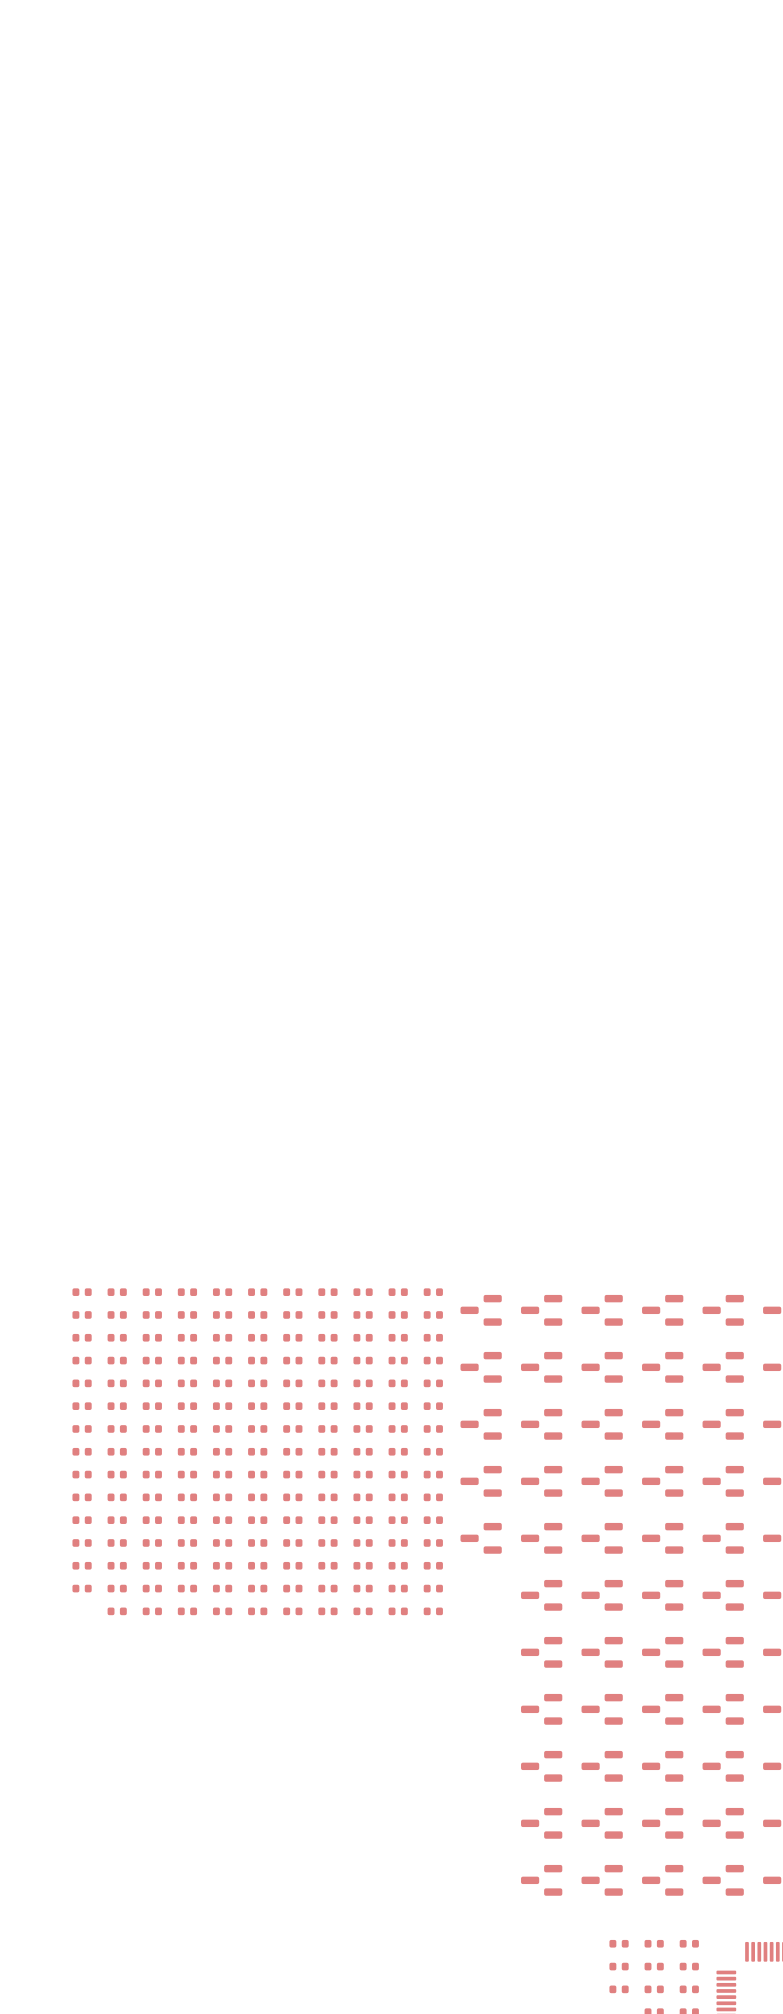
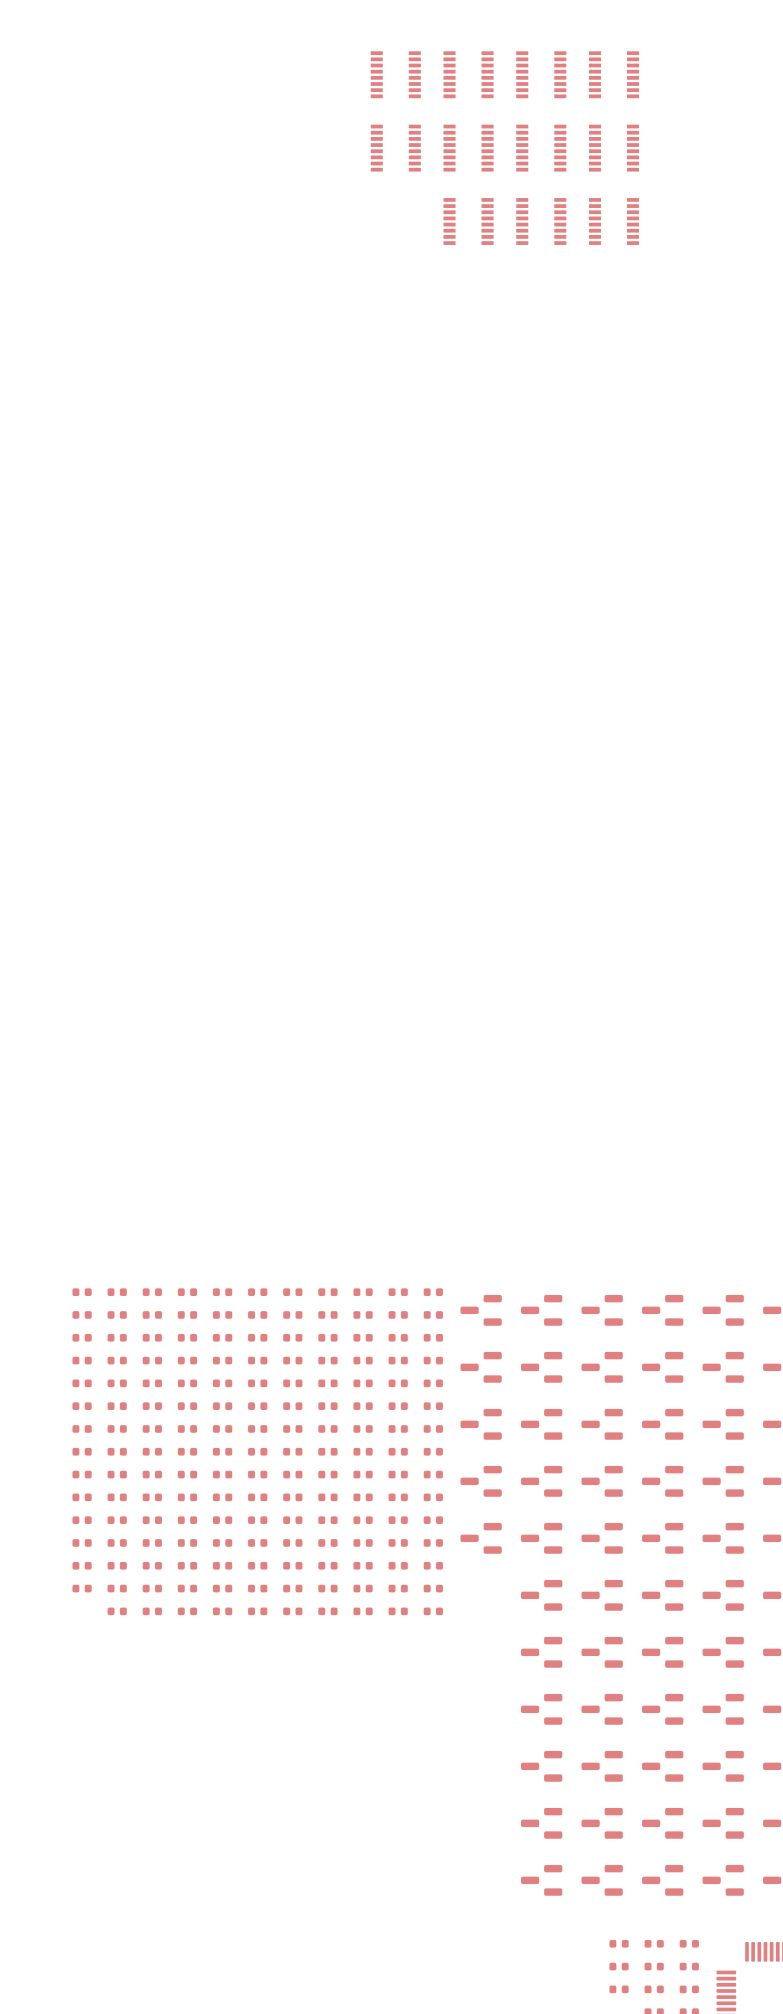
part: none -> (395, 74)
part: none -> (468, 74)
part: none -> (541, 74)
part: none -> (614, 74)
part: none -> (395, 148)
part: none -> (468, 148)
part: none -> (541, 148)
part: none -> (614, 148)
part: none -> (468, 221)
part: none -> (541, 221)
part: none -> (614, 221)

